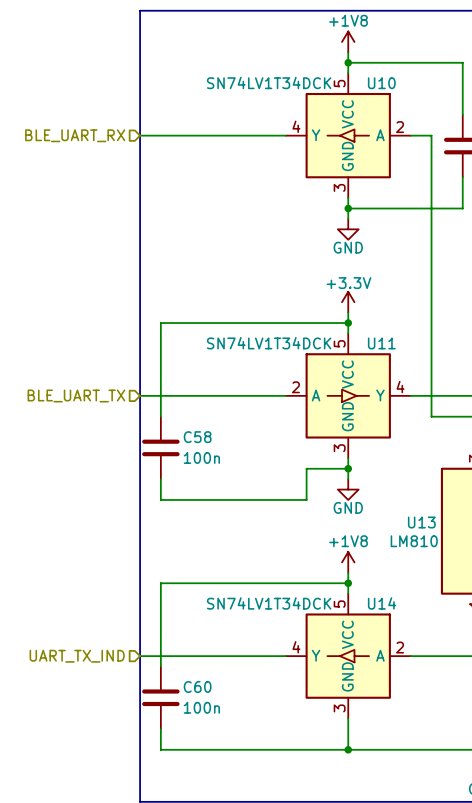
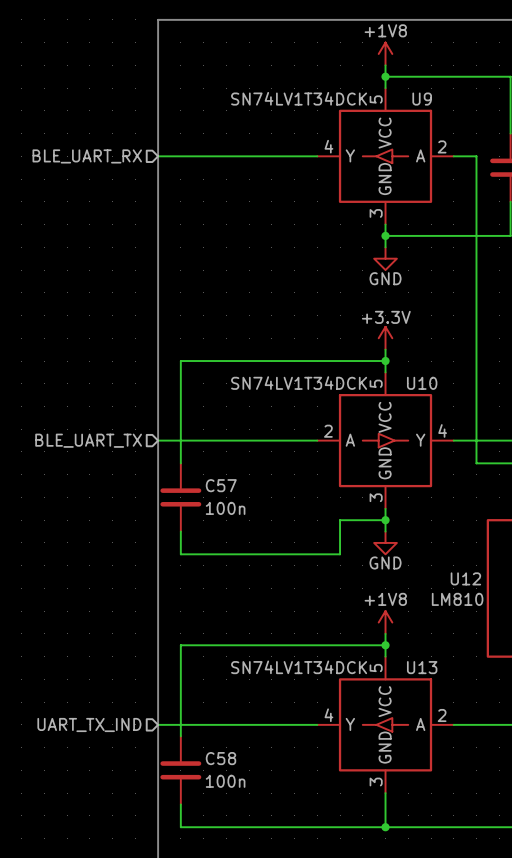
U10 name: U10 (381, 83) -> U9 (422, 99)
U11 name: U11 (381, 343) -> U10 (422, 383)
C58 name: C58 (197, 437) -> C57 (221, 485)
U13 name: U13 (421, 522) -> U12 (465, 578)
U14 name: U14 (382, 603) -> U13 (422, 667)
C60 name: C60 (197, 686) -> C58 (220, 758)

